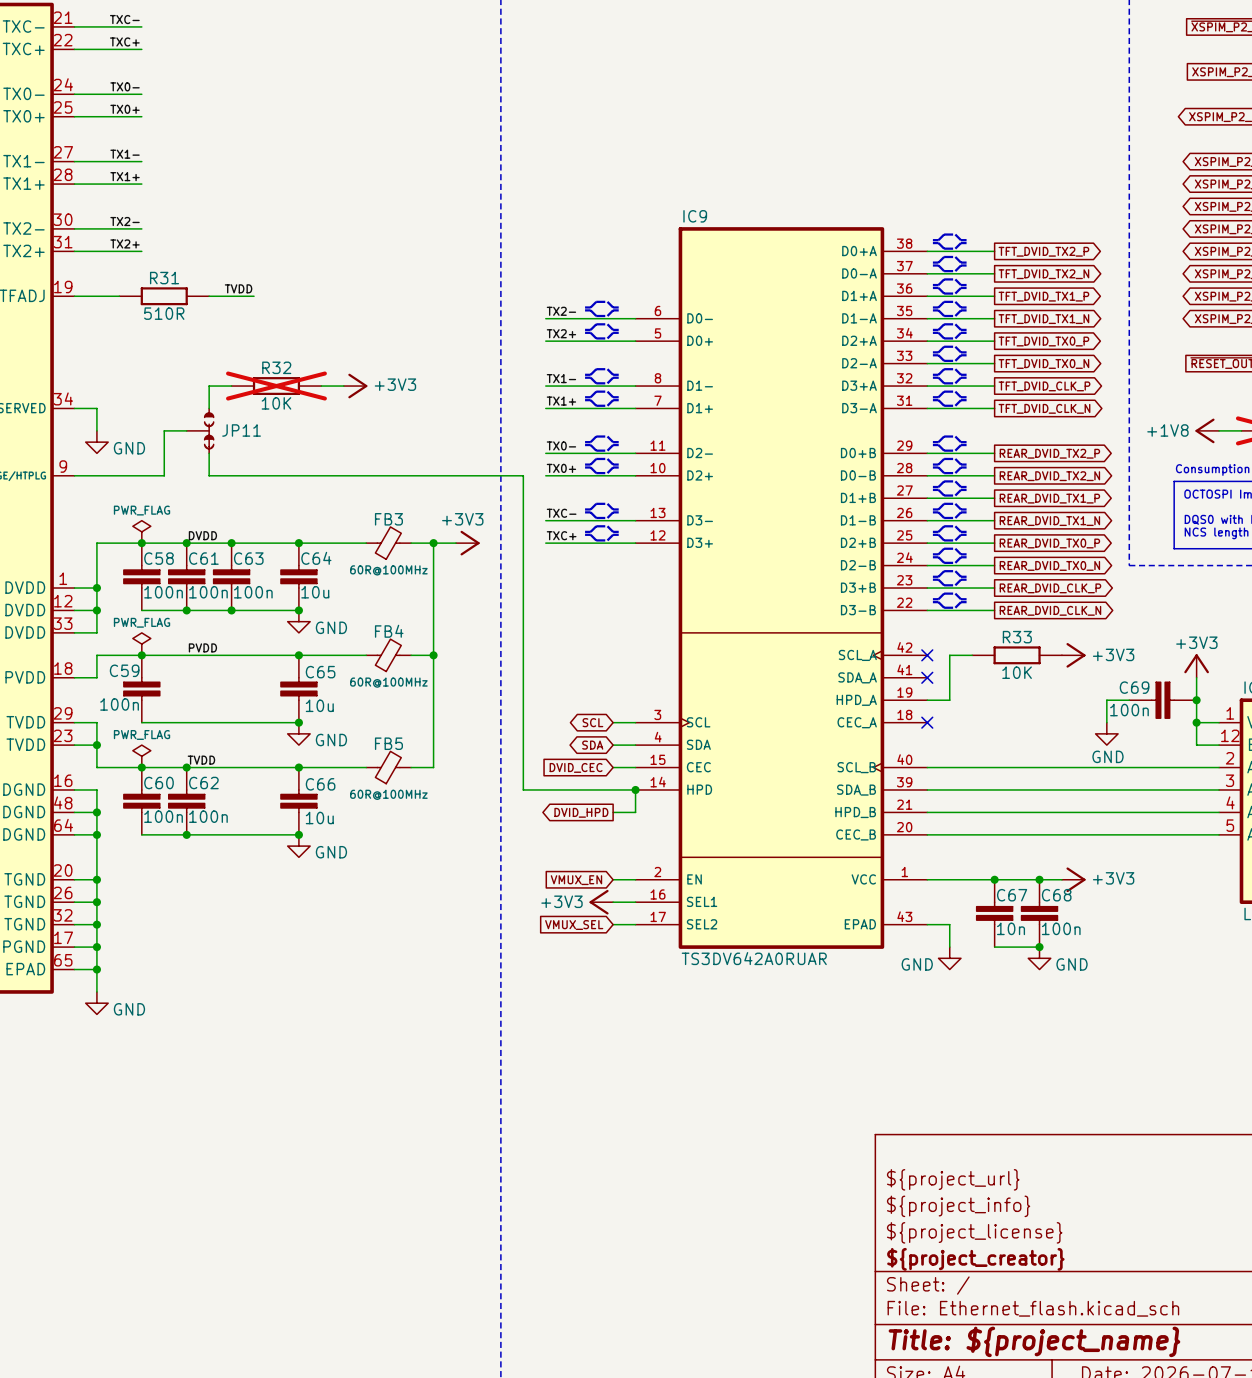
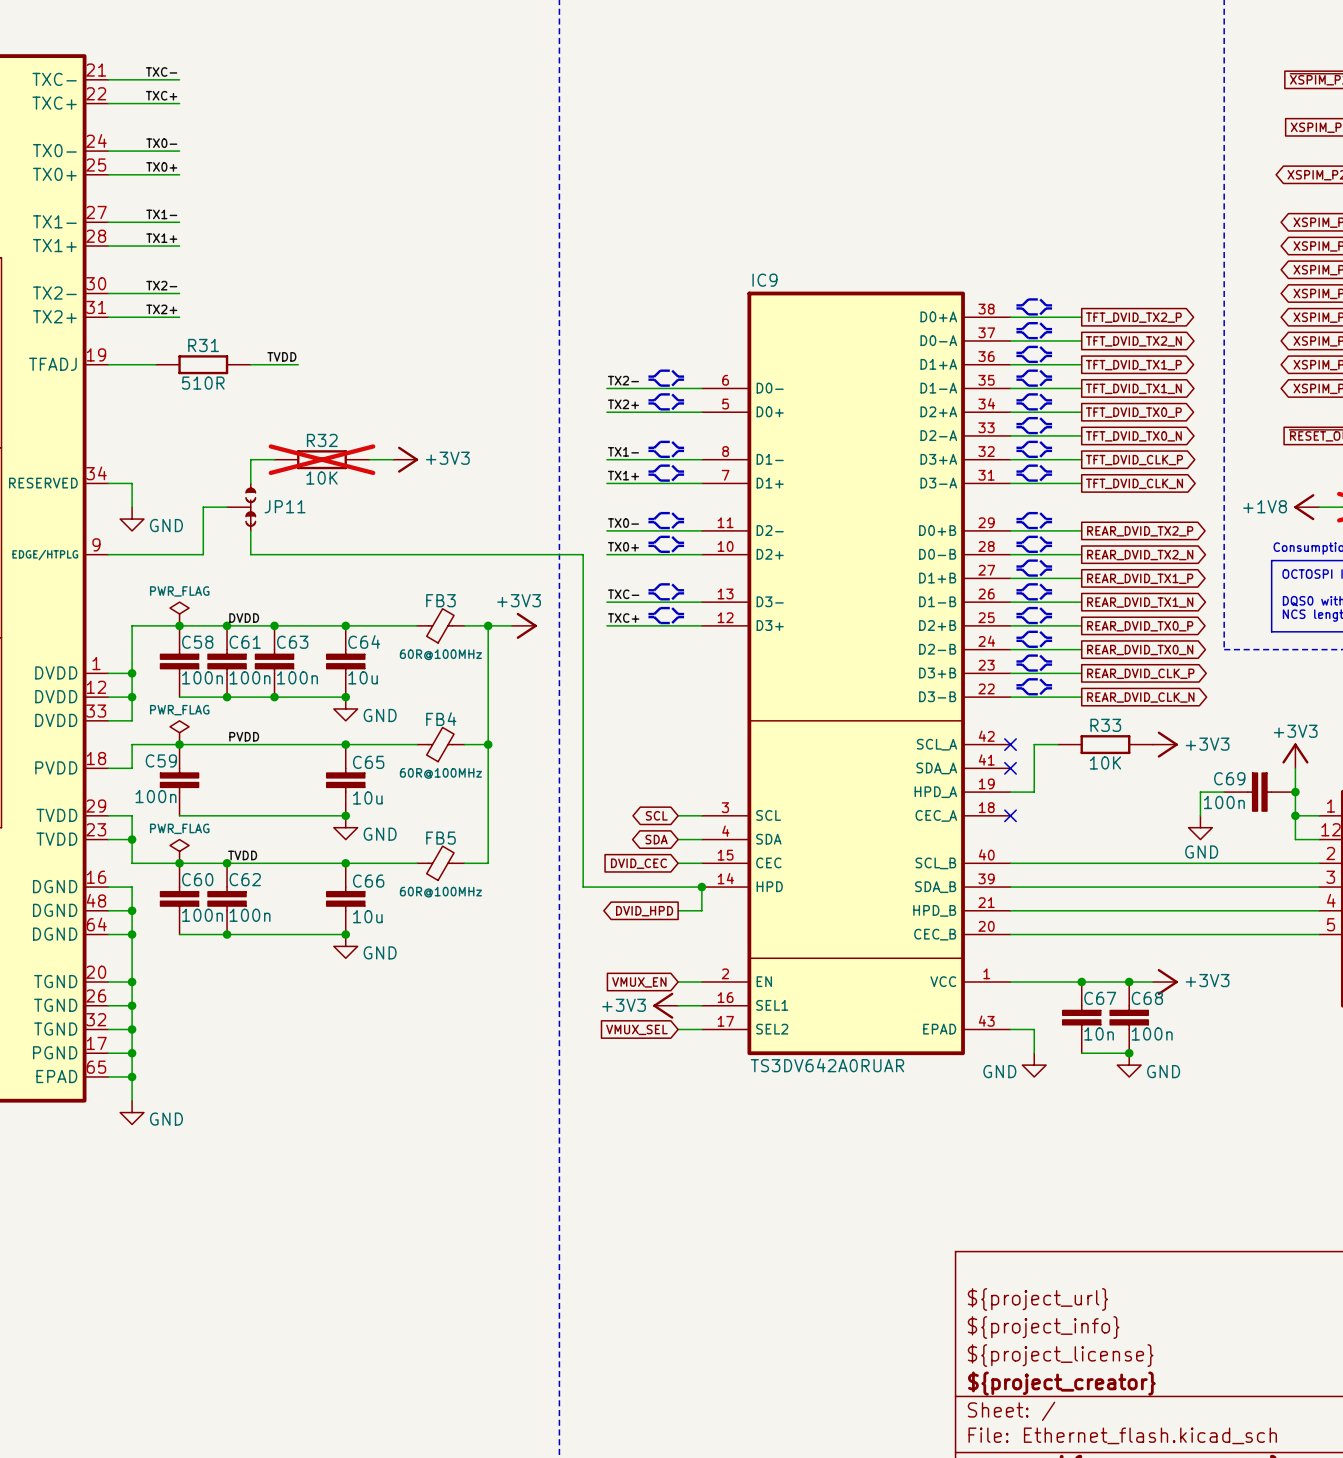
IC9 symbol: [635, 227, 928, 949] -> [701, 291, 1011, 1056]

